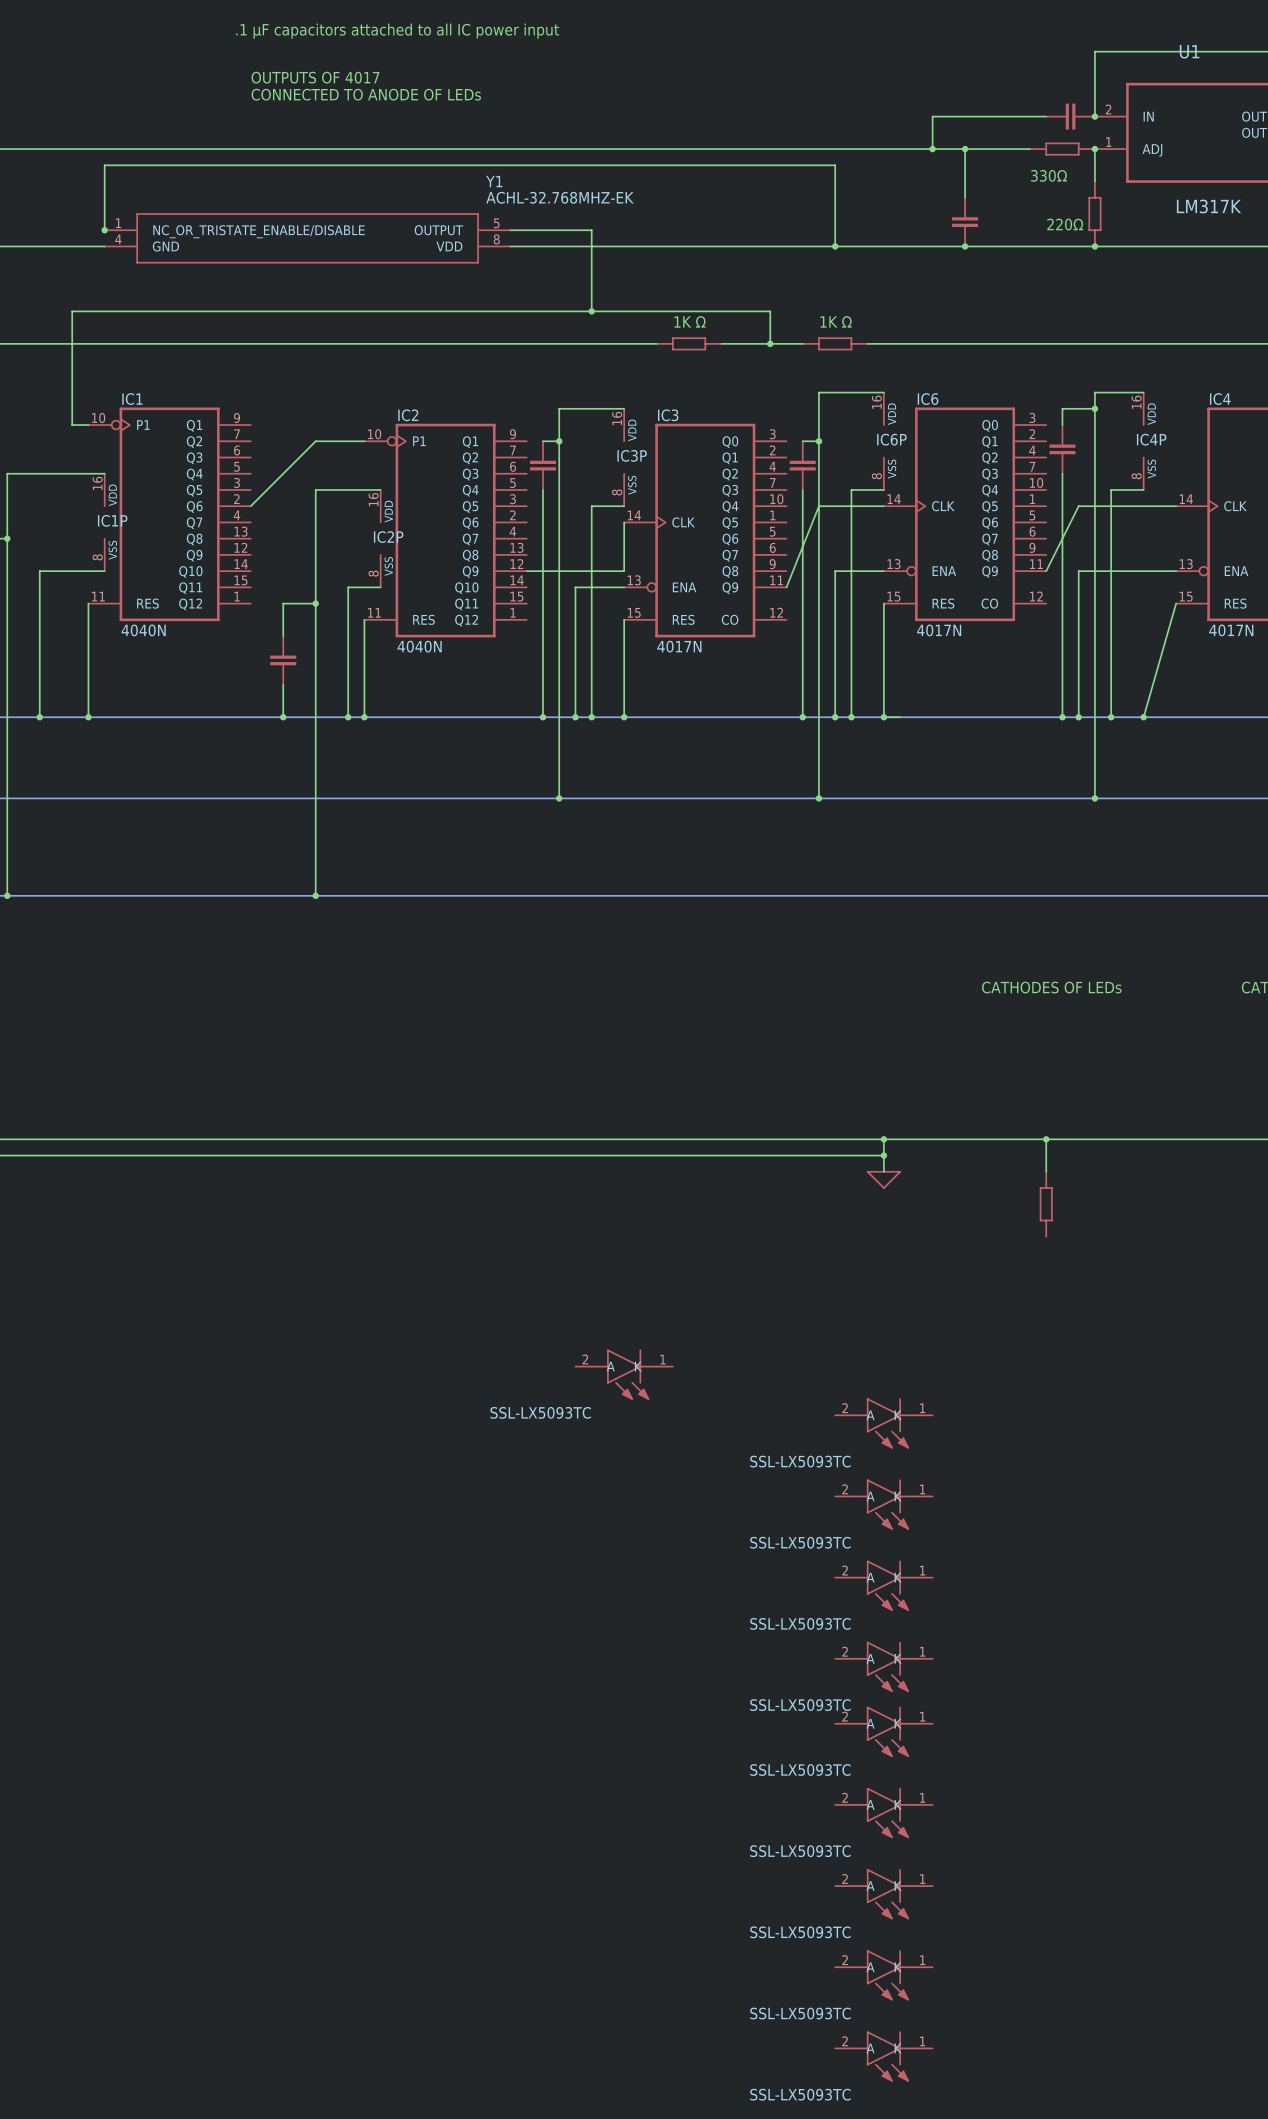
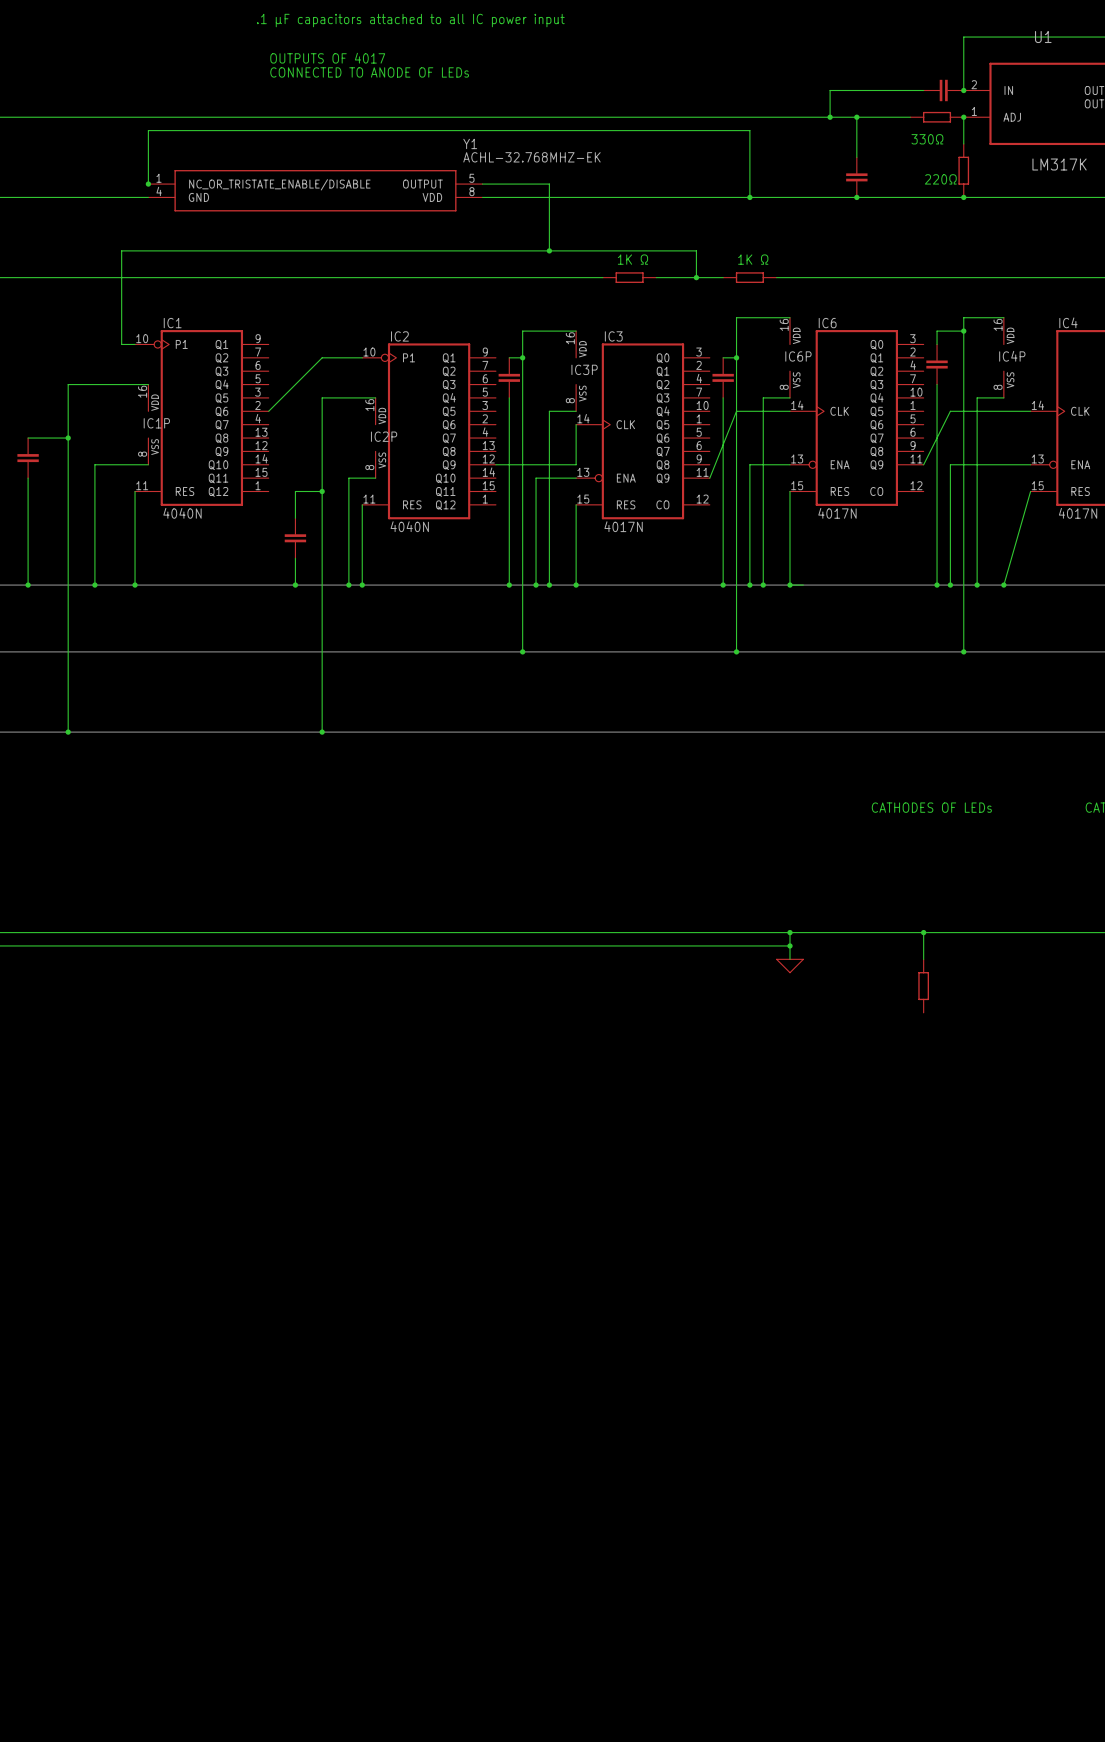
part: SSL-LX5093TC (624, 1374) -> none
part: SSL-LX5093TC (883, 1423) -> none
part: SSL-LX5093TC (883, 1504) -> none
part: SSL-LX5093TC (883, 1585) -> none
part: SSL-LX5093TC (883, 1666) -> none
part: SSL-LX5093TC (883, 1731) -> none
part: SSL-LX5093TC (883, 1813) -> none
part: SSL-LX5093TC (883, 1894) -> none
part: SSL-LX5093TC (883, 1975) -> none
part: SSL-LX5093TC (883, 2056) -> none

